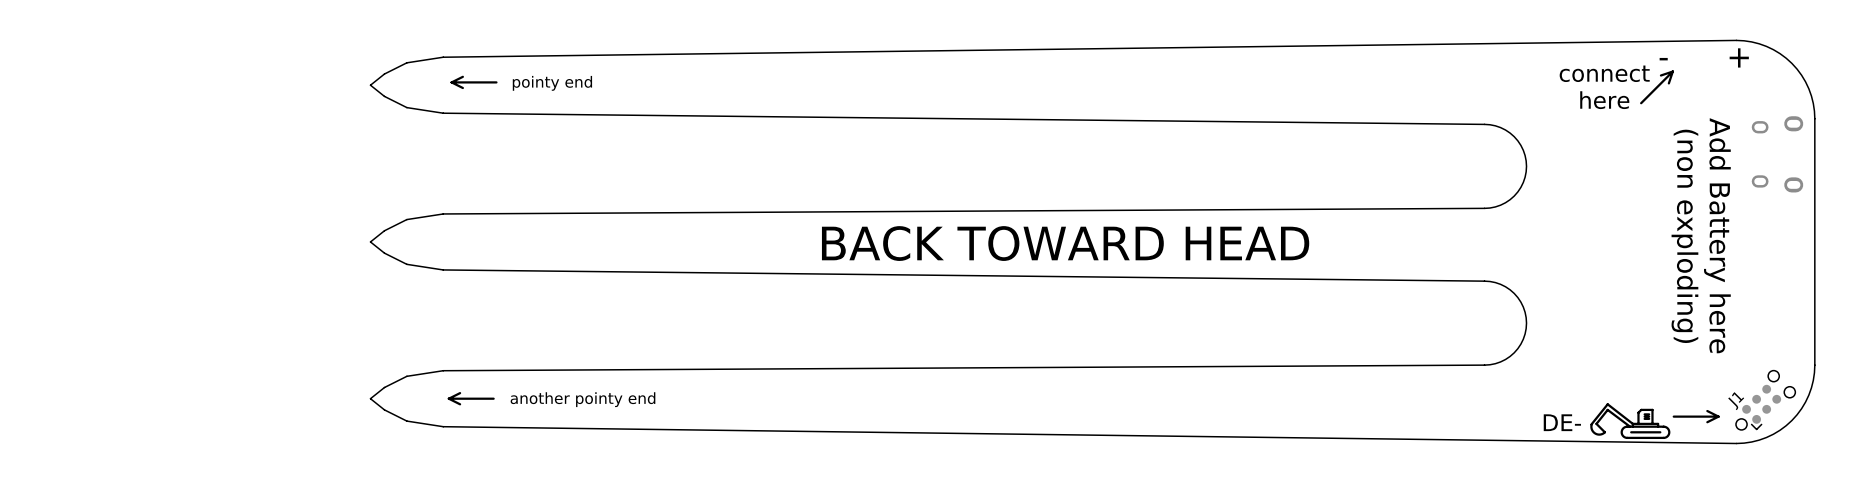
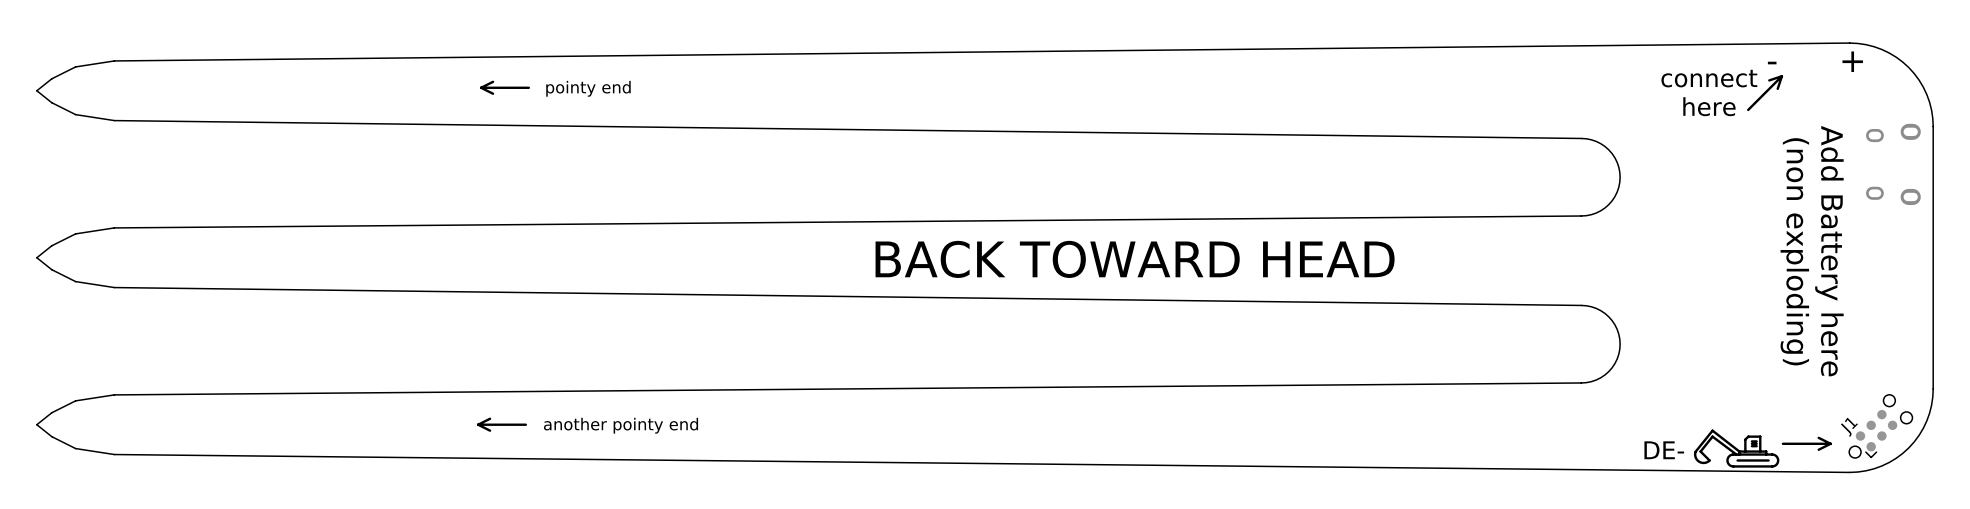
board edge: (1736, 40) (443, 57) (406, 62) (384, 74) (370, 85) (384, 96) (406, 107) (443, 113) (1484, 124) (1500, 127) (1510, 133) (1520, 145) (1526, 160) (1525, 177) (1517, 191) (1500, 205) (1484, 208) (443, 213) (406, 219) (384, 230) (370, 241) (384, 253) (406, 264) (443, 269) (1484, 281) (1500, 284) (1514, 293) (1523, 307) (1526, 323) (1523, 339) (1514, 352) (1500, 361) (1484, 365) (443, 370) (406, 376) (384, 387) (370, 398) (384, 409) (406, 421) (443, 426) (1736, 443) -> (1849, 43) (114, 60) (75, 66) (51, 78) (36, 90) (51, 102) (75, 114) (114, 120) (1581, 138) (1591, 139) (1604, 146) (1614, 157) (1619, 172) (1618, 187) (1612, 200) (1600, 210) (1581, 216) (114, 227) (75, 233) (51, 245) (36, 257) (51, 269) (75, 281) (114, 287) (1581, 305) (1596, 308) (1608, 316) (1617, 329) (1620, 344) (1617, 359) (1608, 371) (1596, 380) (1581, 382) (114, 394) (75, 400) (51, 412) (36, 424) (51, 436) (75, 448) (114, 454) (1849, 472)

